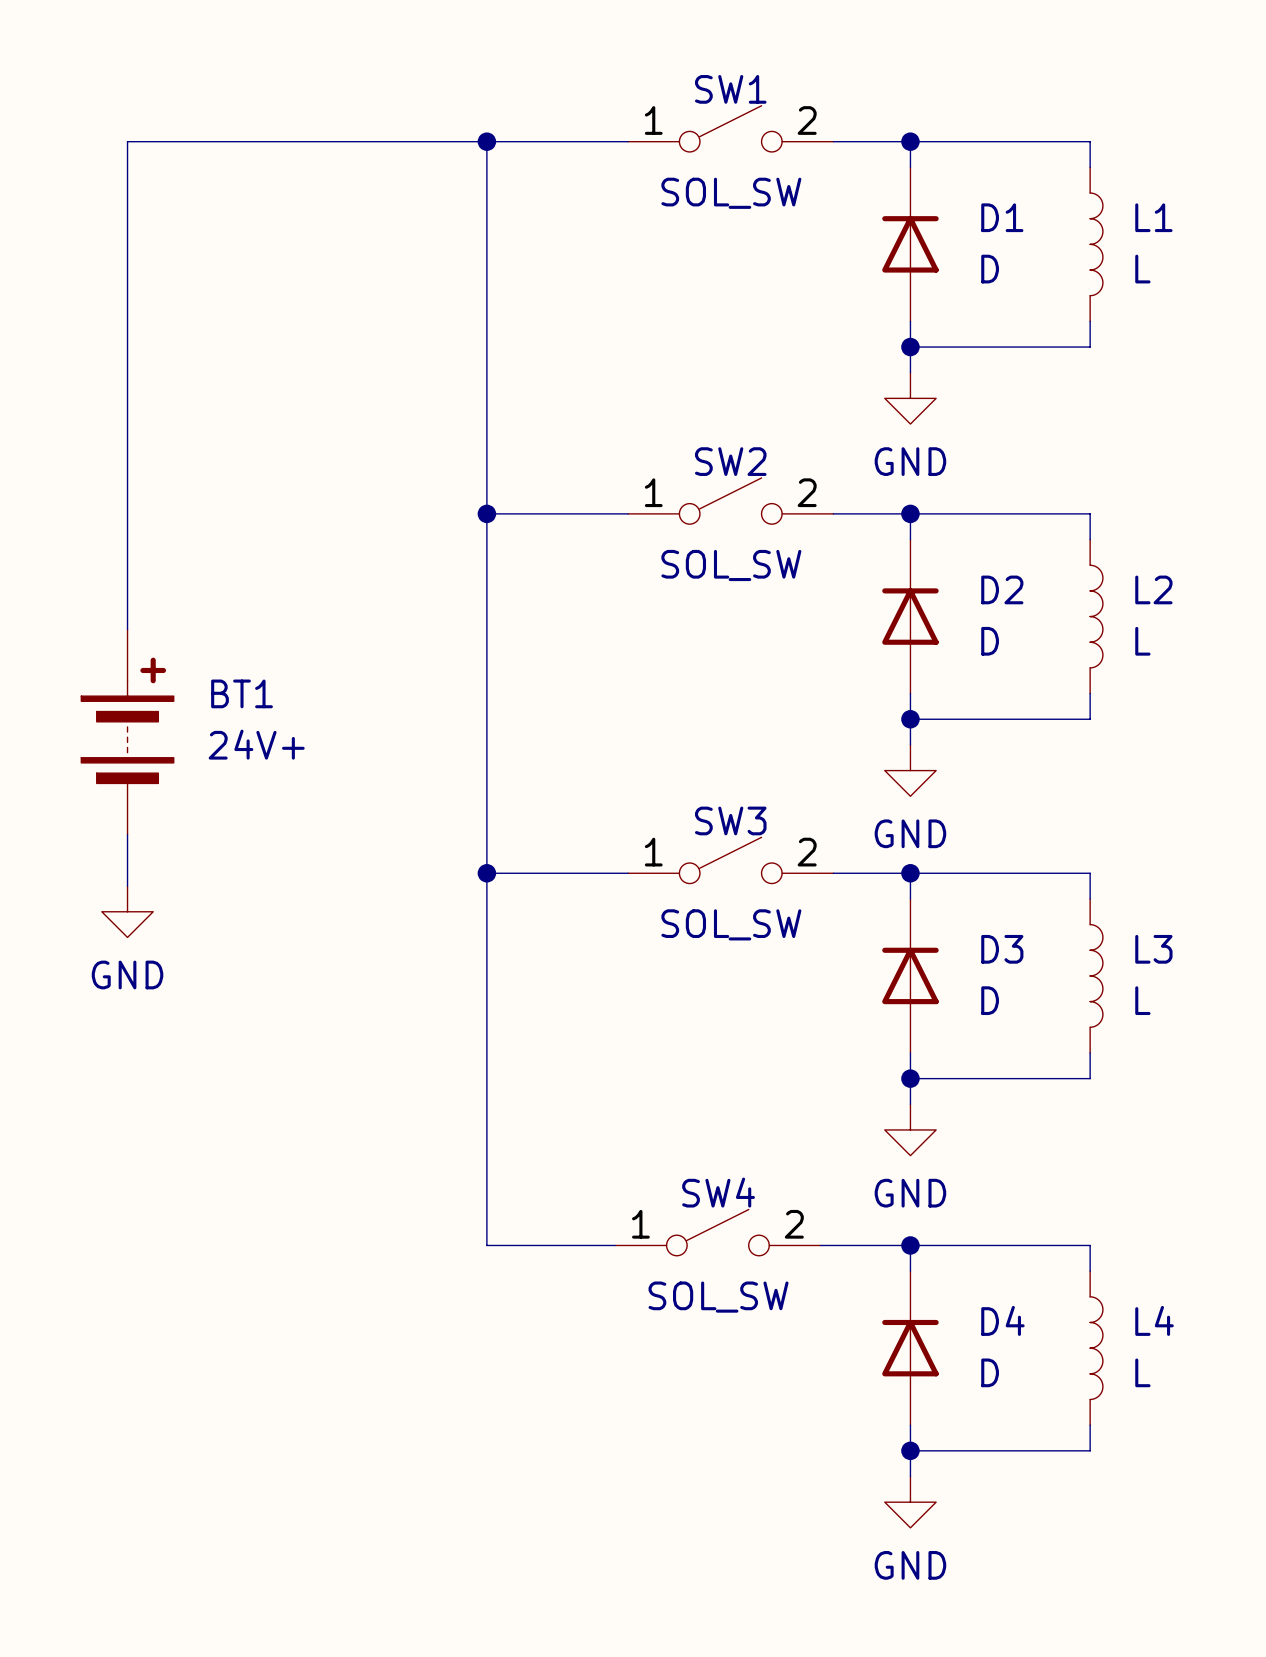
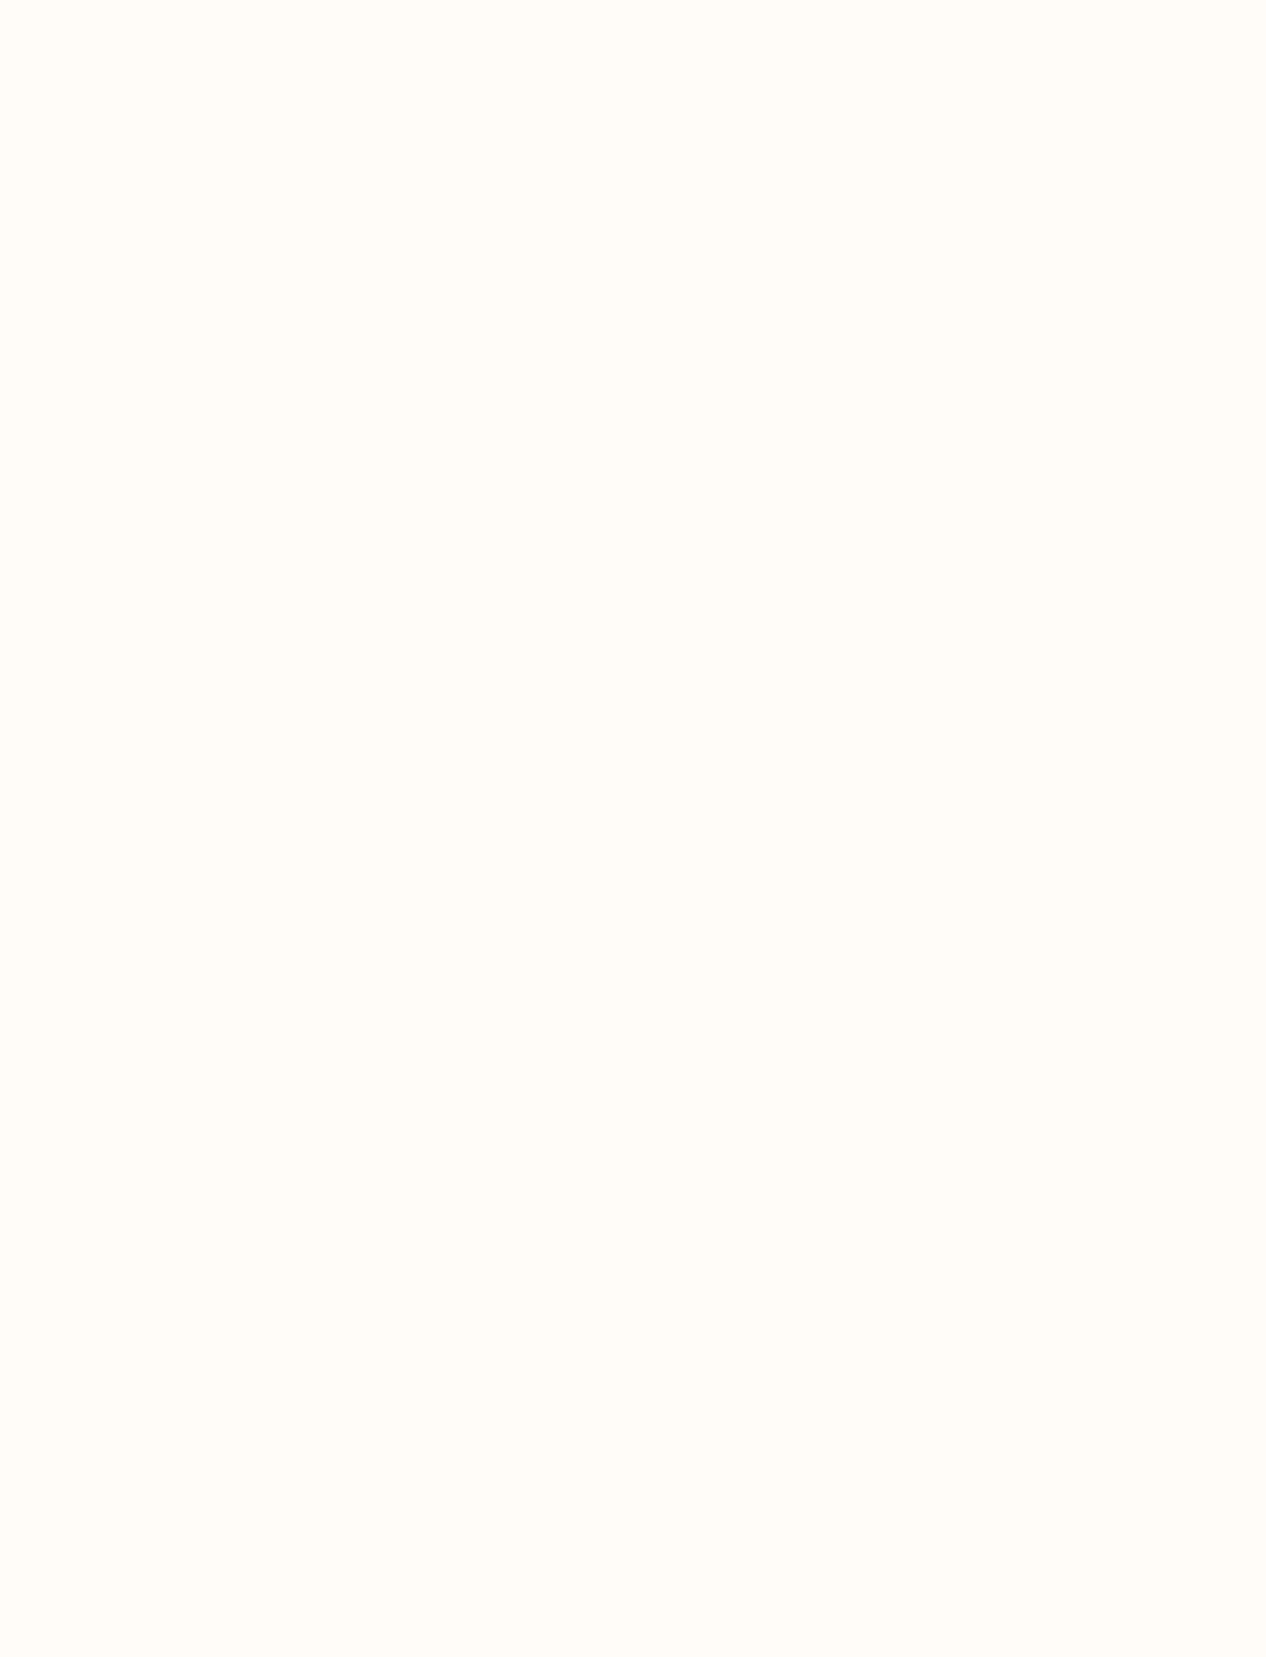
SW1: SOL_SW (730, 128) -> none
wire: (486, 141) (486, 1245) (615, 1245) -> none
junction: (486, 141) -> none
wire: (628, 141) (127, 141) (127, 629) -> none
wire: (833, 141) (1090, 141) (1090, 167) -> none
wire: (910, 141) (910, 167) -> none
junction: (910, 141) -> none
D1: D (910, 244) -> none
L1: L (1096, 244) -> none
wire: (910, 321) (910, 372) -> none
wire: (1090, 321) (1090, 347) (910, 347) -> none
junction: (910, 347) -> none
power symbol: GND (910, 398) -> none
SW2: SOL_SW (730, 501) -> none
wire: (486, 513) (628, 513) -> none
junction: (486, 513) -> none
wire: (833, 513) (1090, 513) (1090, 539) -> none
wire: (910, 513) (910, 539) -> none
junction: (910, 513) -> none
D2: D (910, 616) -> none
L2: L (1096, 616) -> none
wire: (910, 693) (910, 744) -> none
wire: (1090, 693) (1090, 719) (910, 719) -> none
junction: (910, 719) -> none
BT1: 24V+ (127, 732) -> none
power symbol: GND (910, 770) -> none
wire: (127, 834) (127, 886) -> none
SW3: SOL_SW (730, 860) -> none
wire: (486, 873) (628, 873) -> none
junction: (486, 873) -> none
wire: (833, 873) (1090, 873) (1090, 898) -> none
wire: (910, 873) (910, 898) -> none
junction: (910, 873) -> none
power symbol: GND (127, 911) -> none
D3: D (910, 975) -> none
L3: L (1096, 975) -> none
wire: (910, 1052) (910, 1104) -> none
wire: (1090, 1052) (1090, 1078) (910, 1078) -> none
junction: (910, 1078) -> none
power symbol: GND (910, 1129) -> none
SW4: SOL_SW (717, 1232) -> none
wire: (820, 1245) (1090, 1245) (1090, 1271) -> none
wire: (910, 1245) (910, 1271) -> none
junction: (910, 1245) -> none
D4: D (910, 1348) -> none
L4: L (1096, 1348) -> none
wire: (910, 1425) (910, 1476) -> none
wire: (1090, 1425) (1090, 1450) (910, 1450) -> none
junction: (910, 1450) -> none
power symbol: GND (910, 1502) -> none

